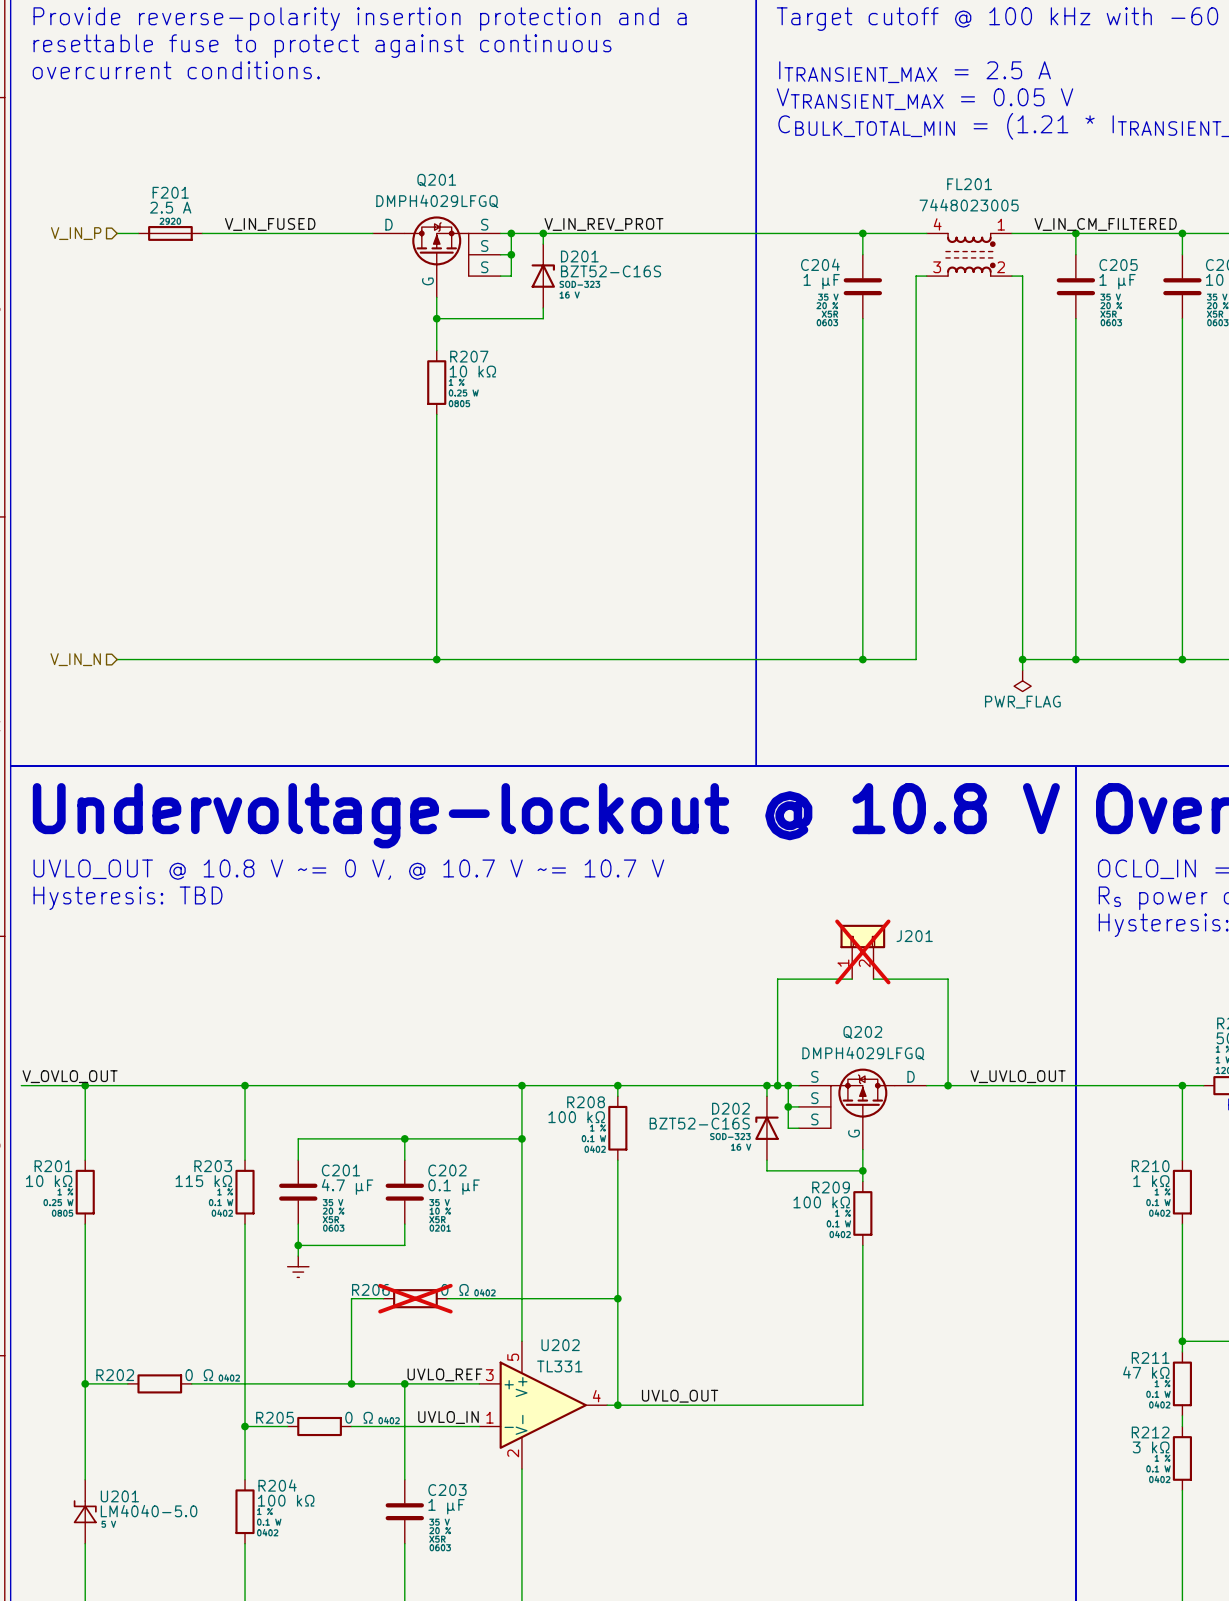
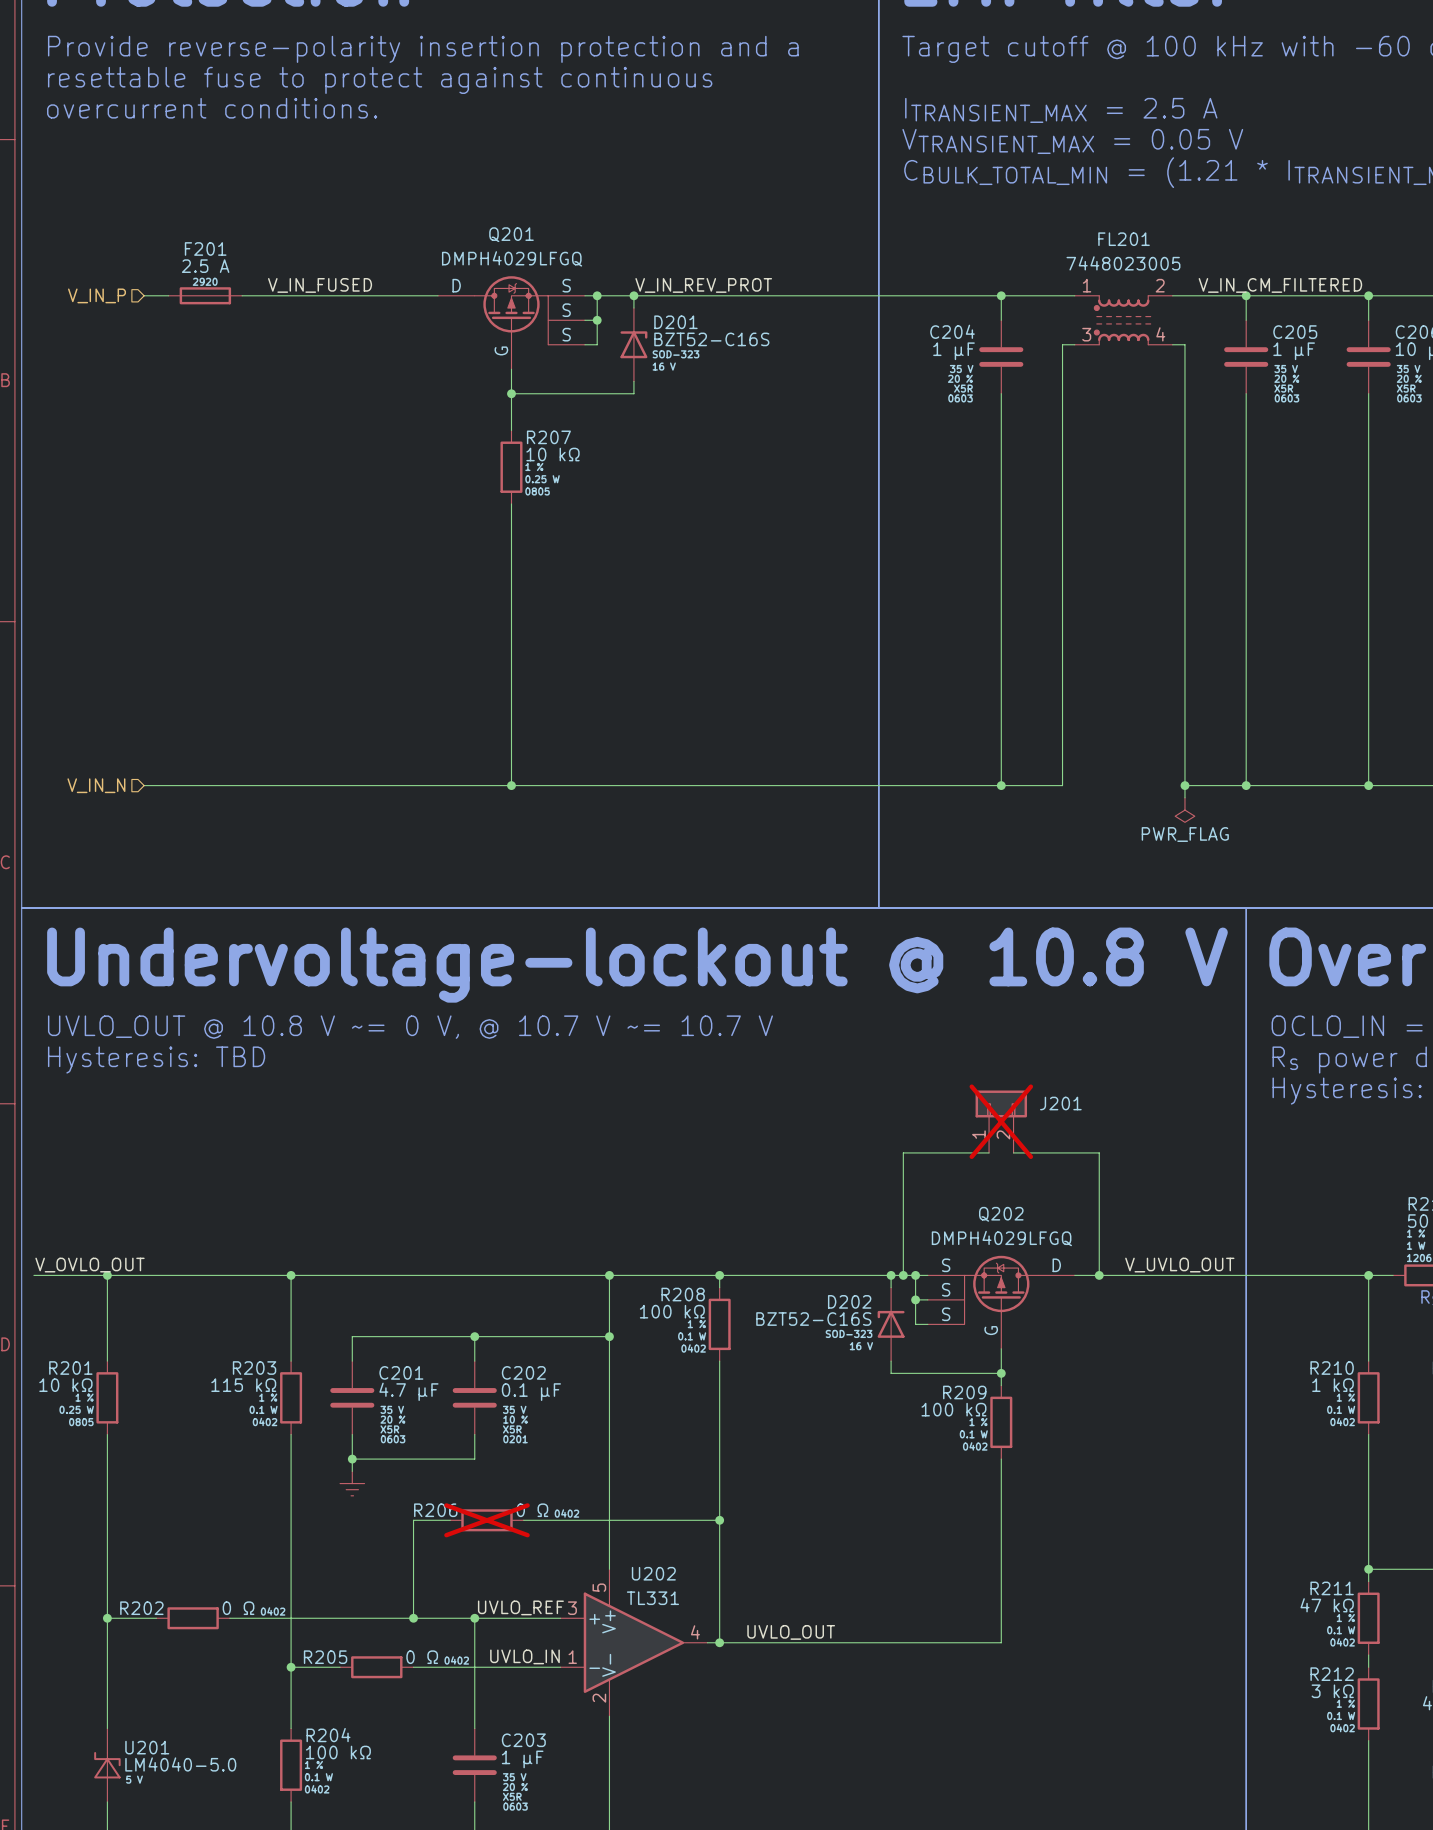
FL201 symbol: [926, 233, 1012, 277] -> [1074, 295, 1173, 345]

